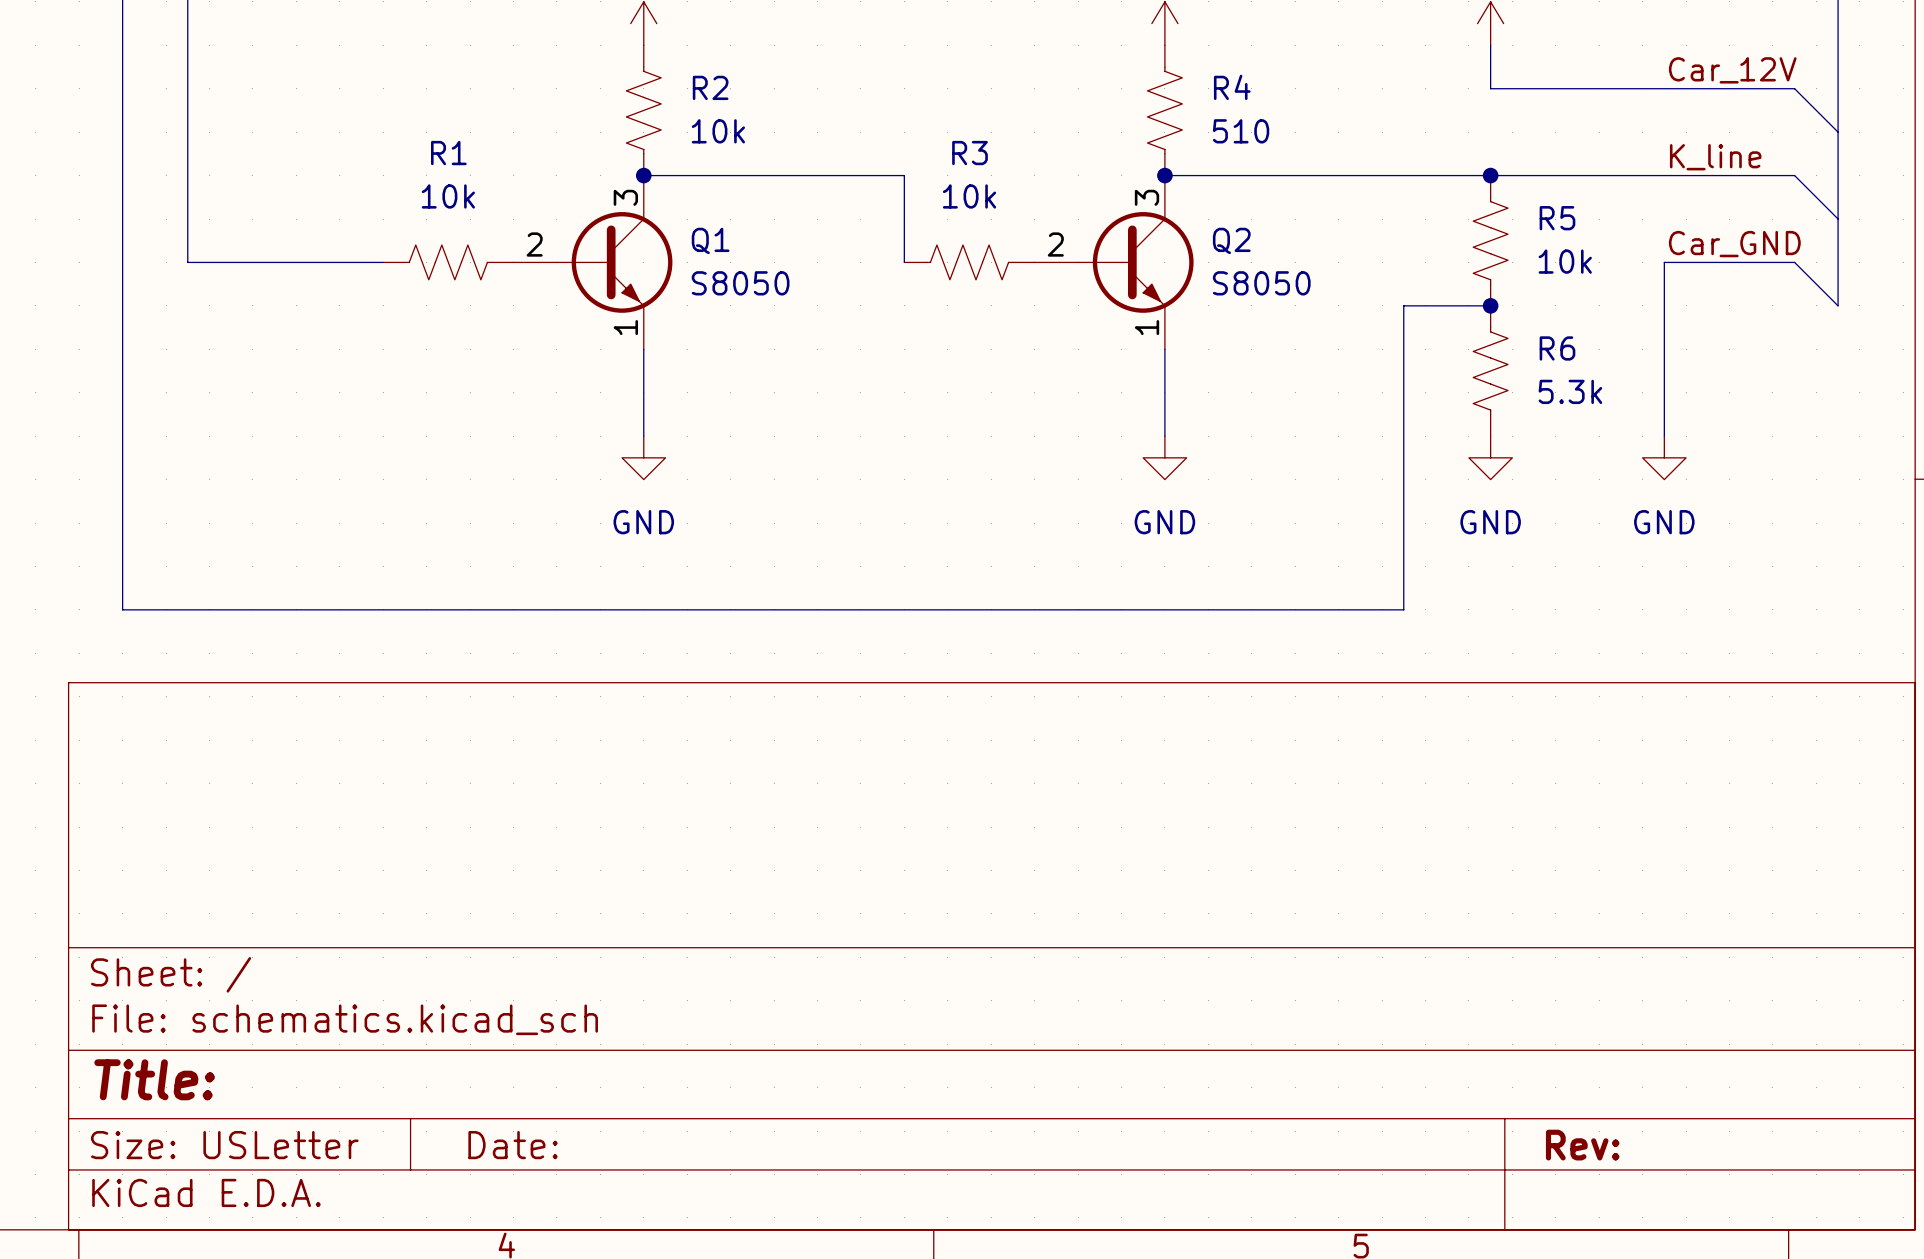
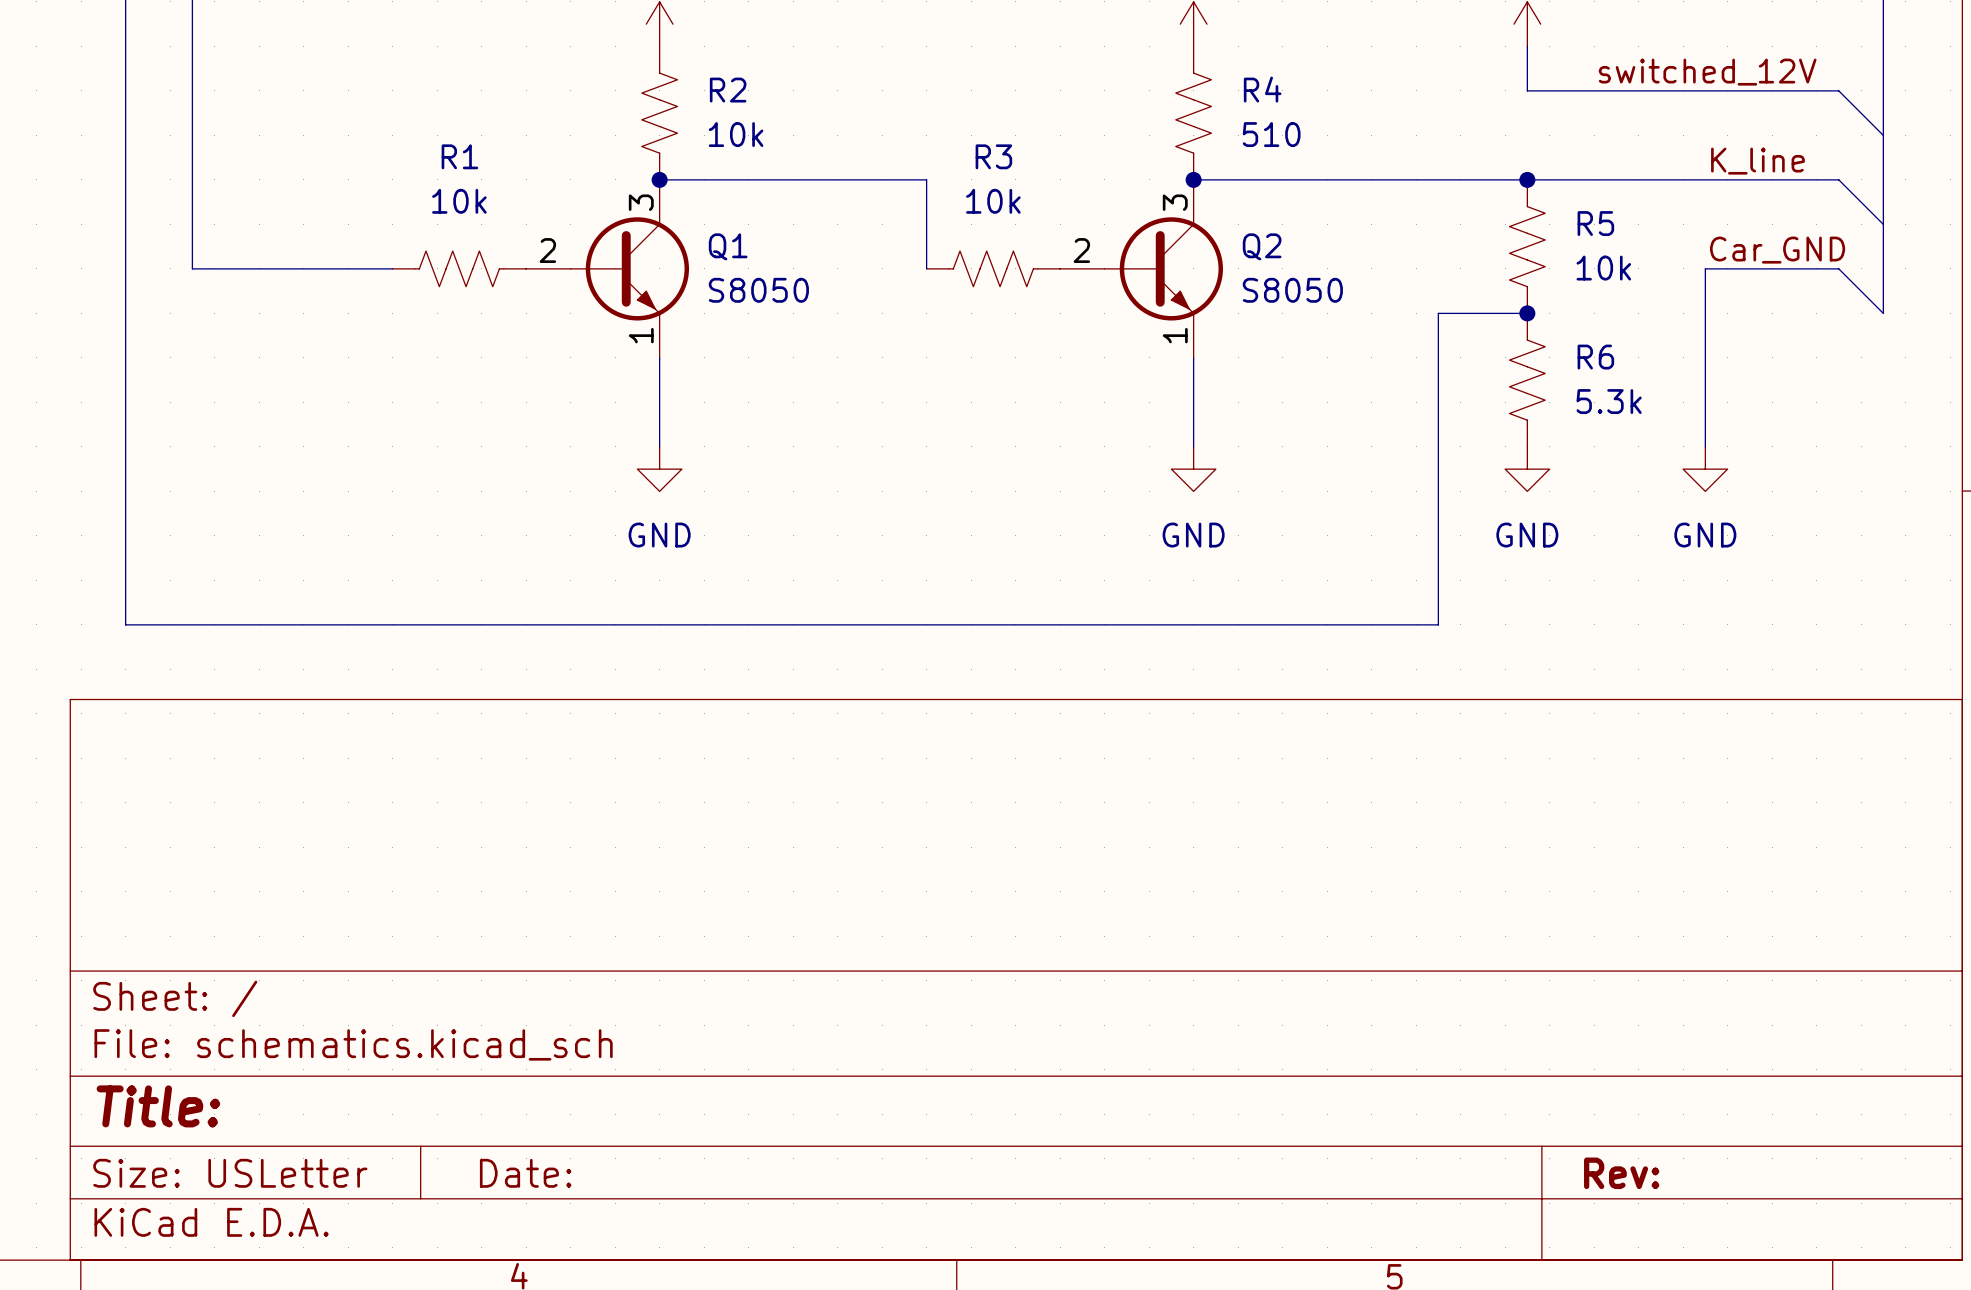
label: none -> switched_12V (1707, 72)
label: Car_12V (1732, 70) -> none

